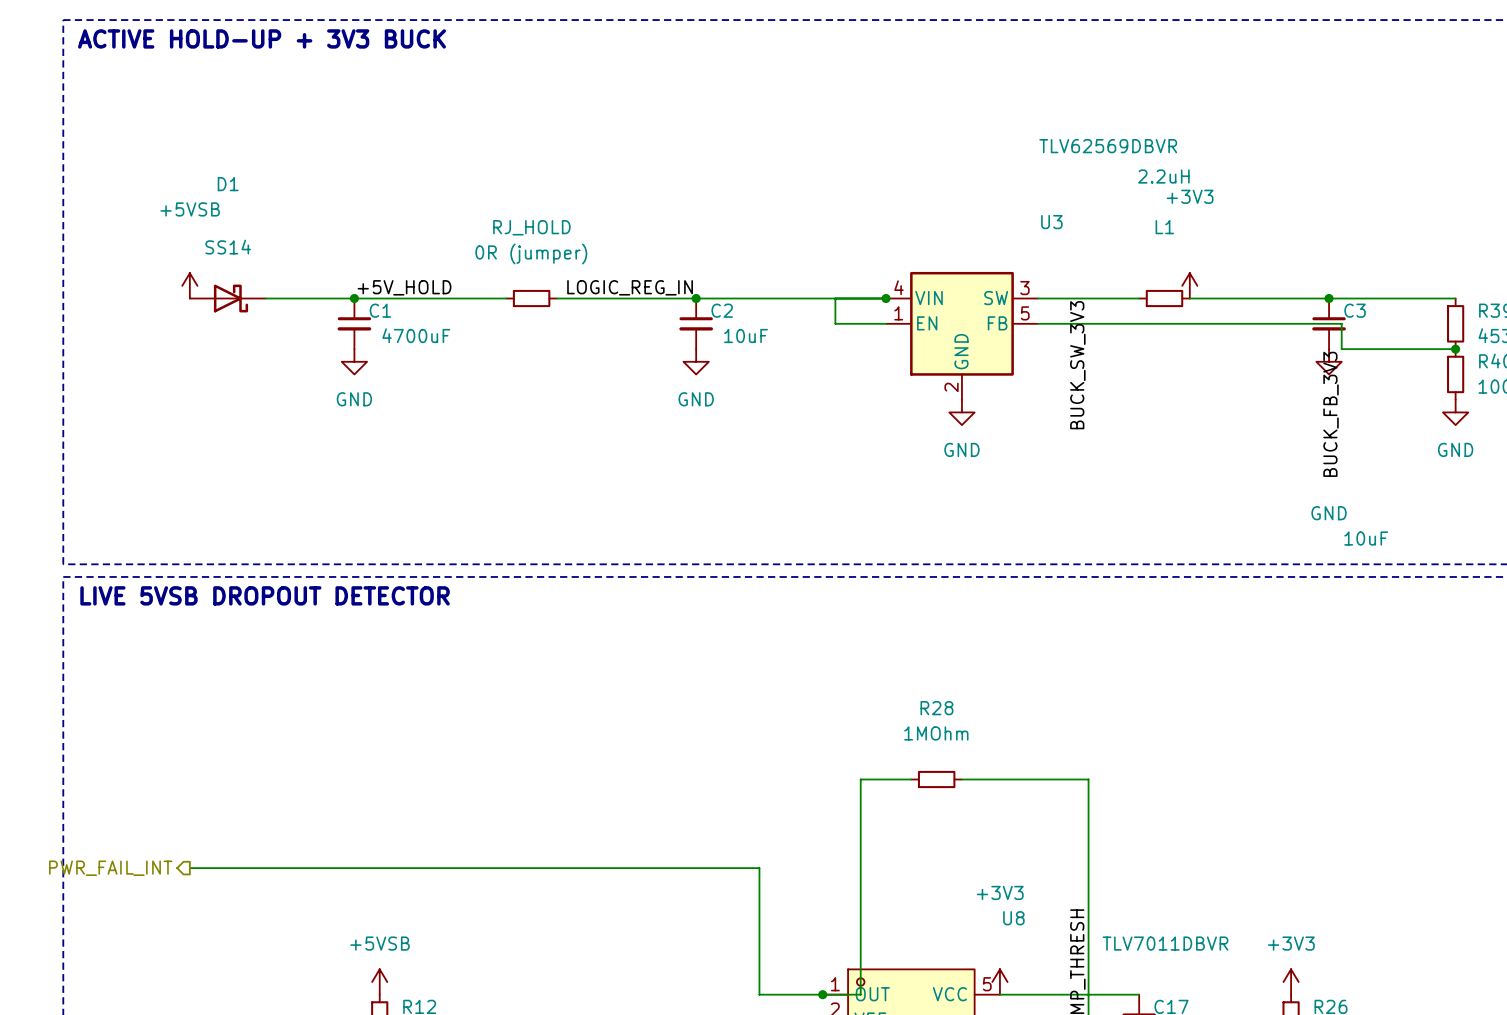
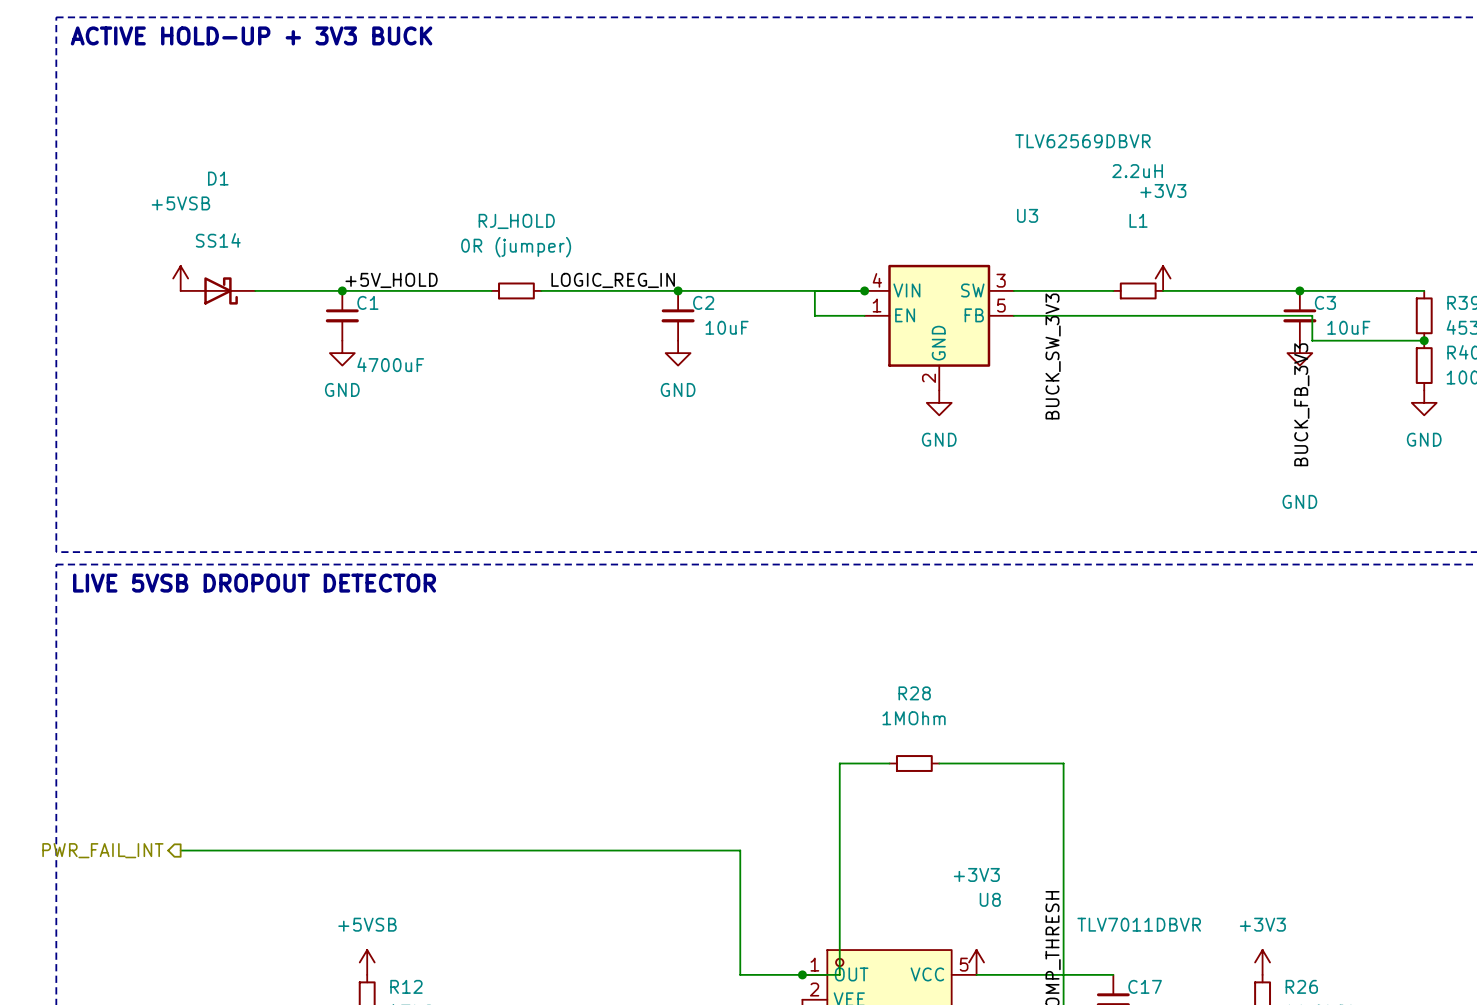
C1 value position: 4700uF (416, 335) -> 4700uF (390, 364)
C3 value position: 10uF (1366, 538) -> 10uF (1348, 327)

